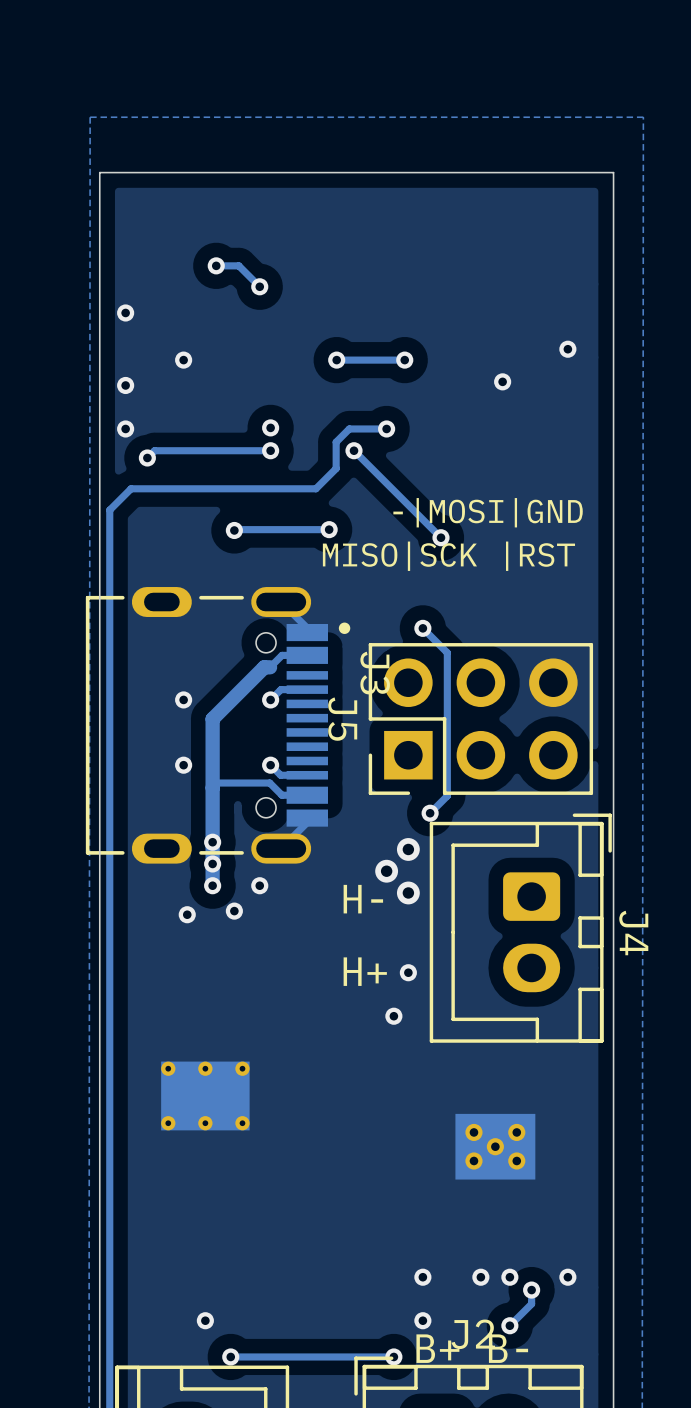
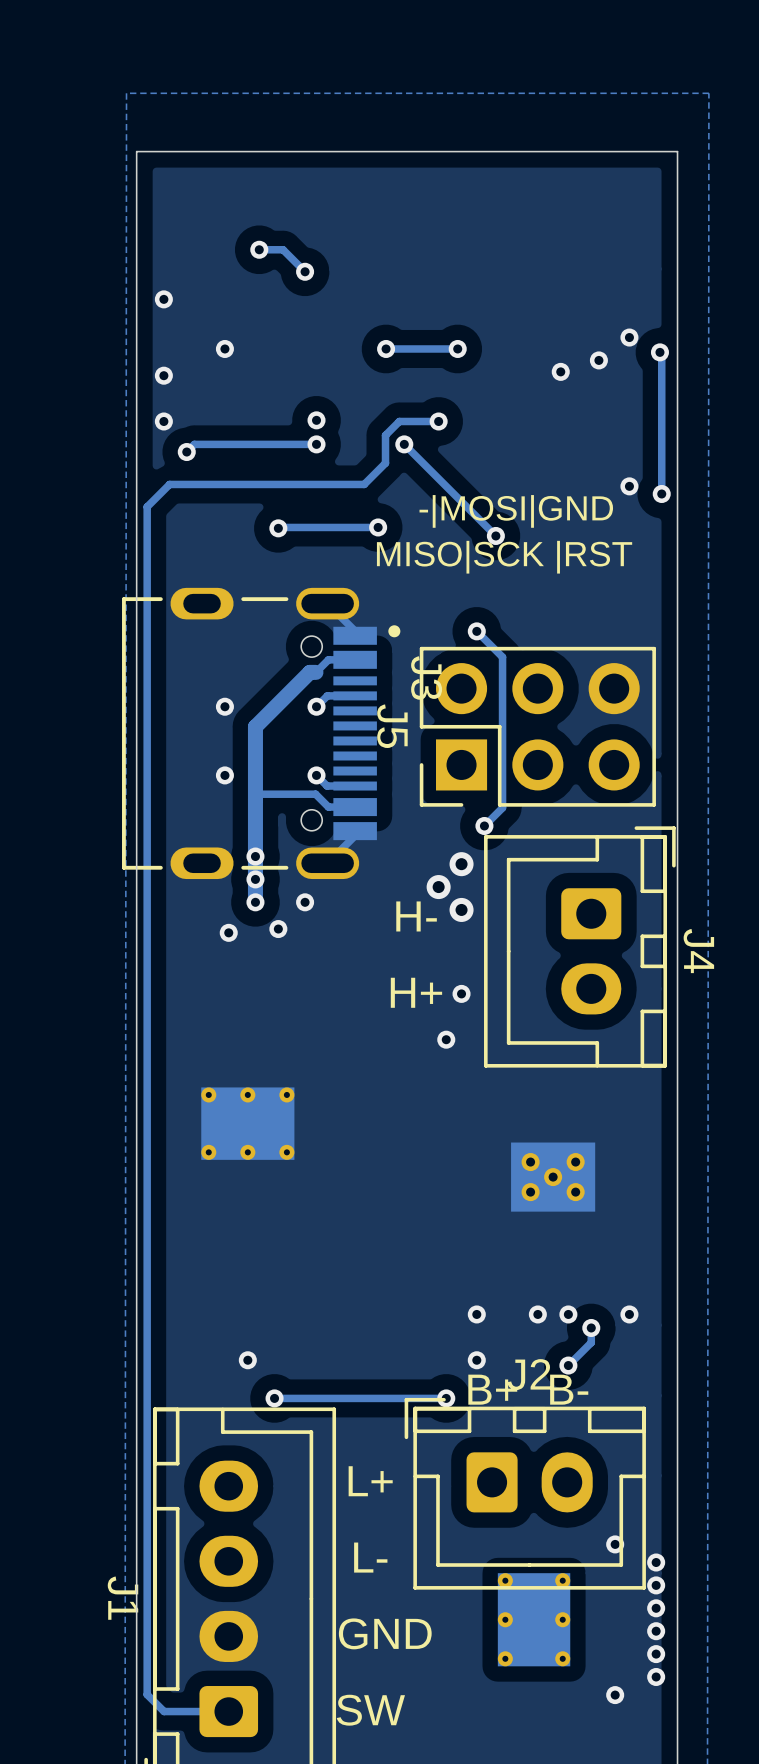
track: none -> (659, 352) (661, 354) (661, 493)
via: none -> (659, 352)
via: none -> (598, 360)
via: none -> (629, 486)
via: none -> (661, 493)

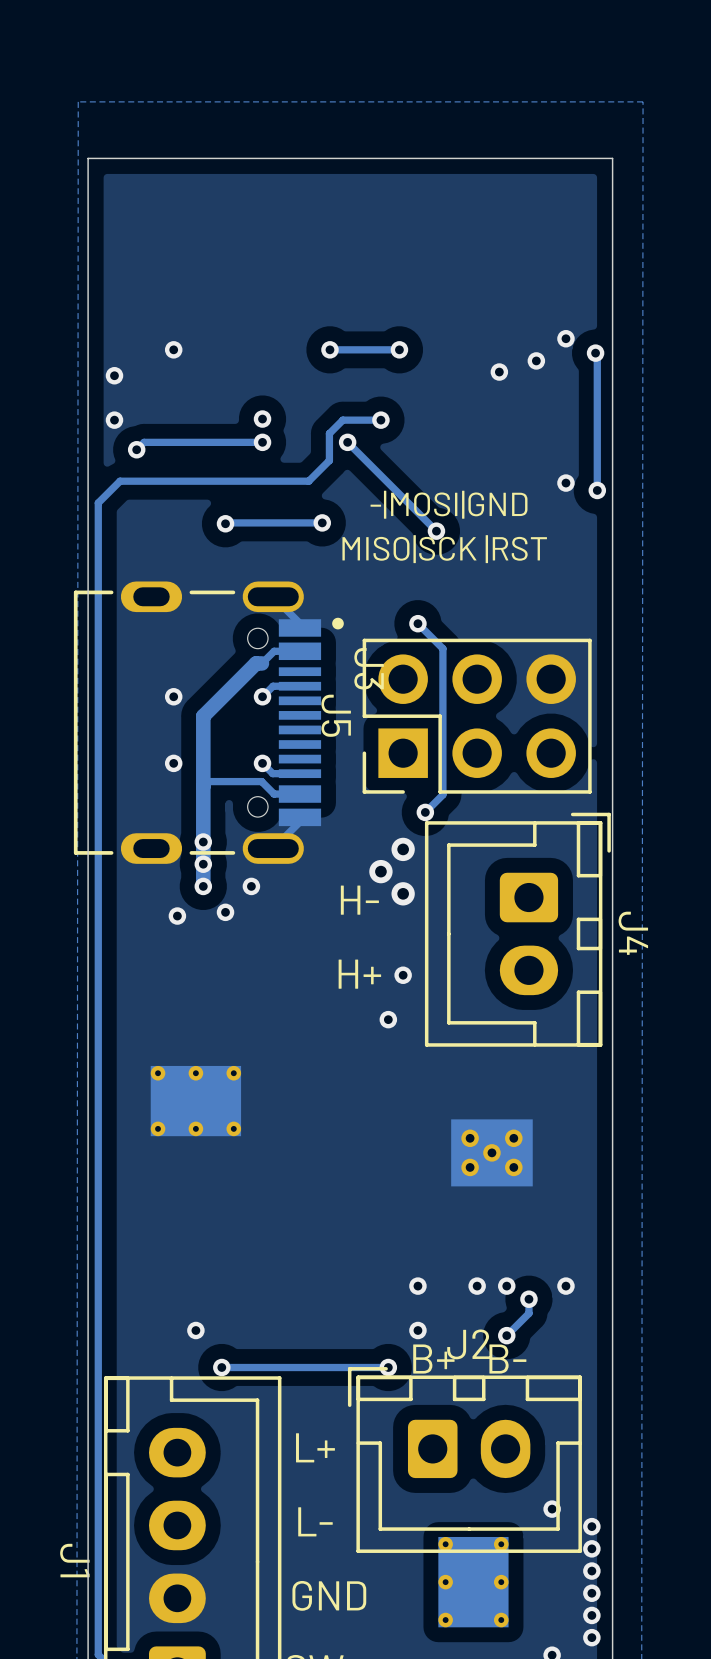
track: (259, 249) (283, 249) (305, 271) -> none
via: (259, 249) -> none
via: (305, 271) -> none
via: (163, 299) -> none

